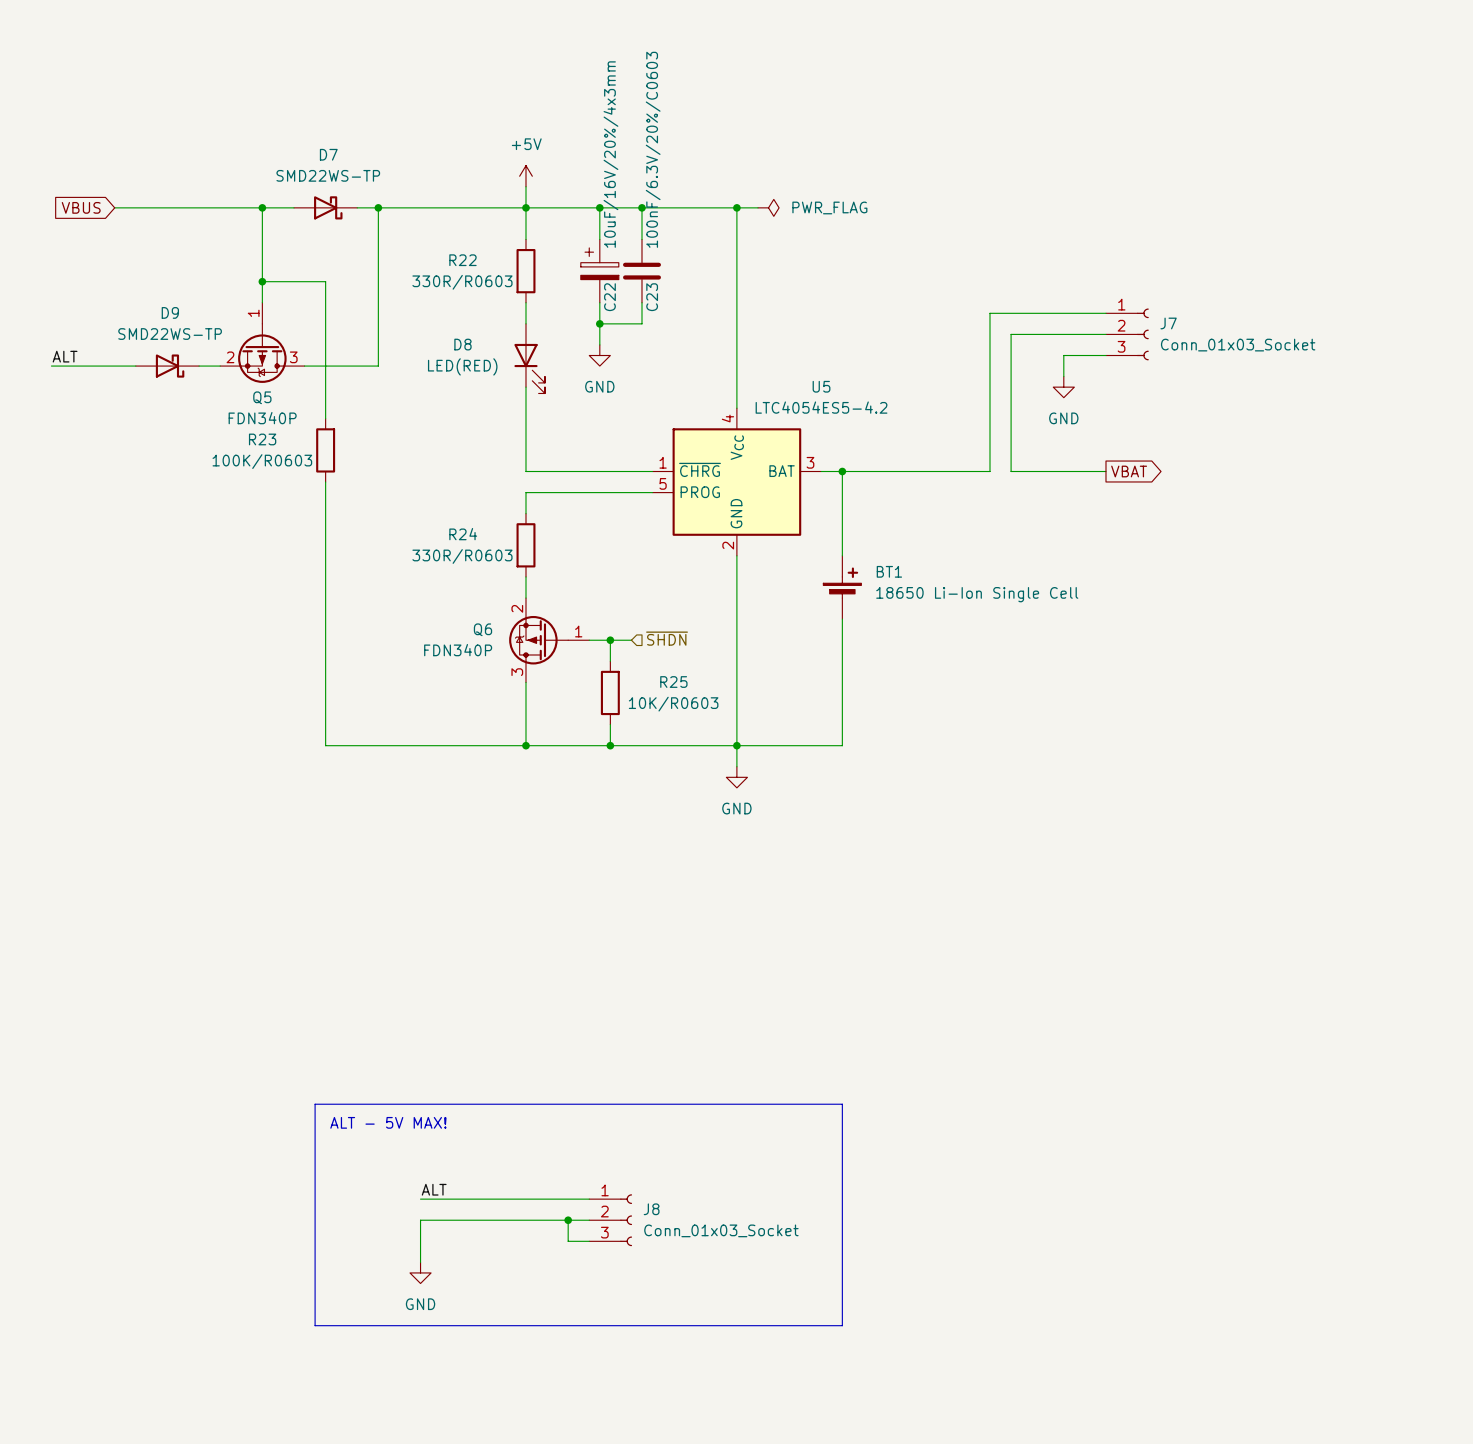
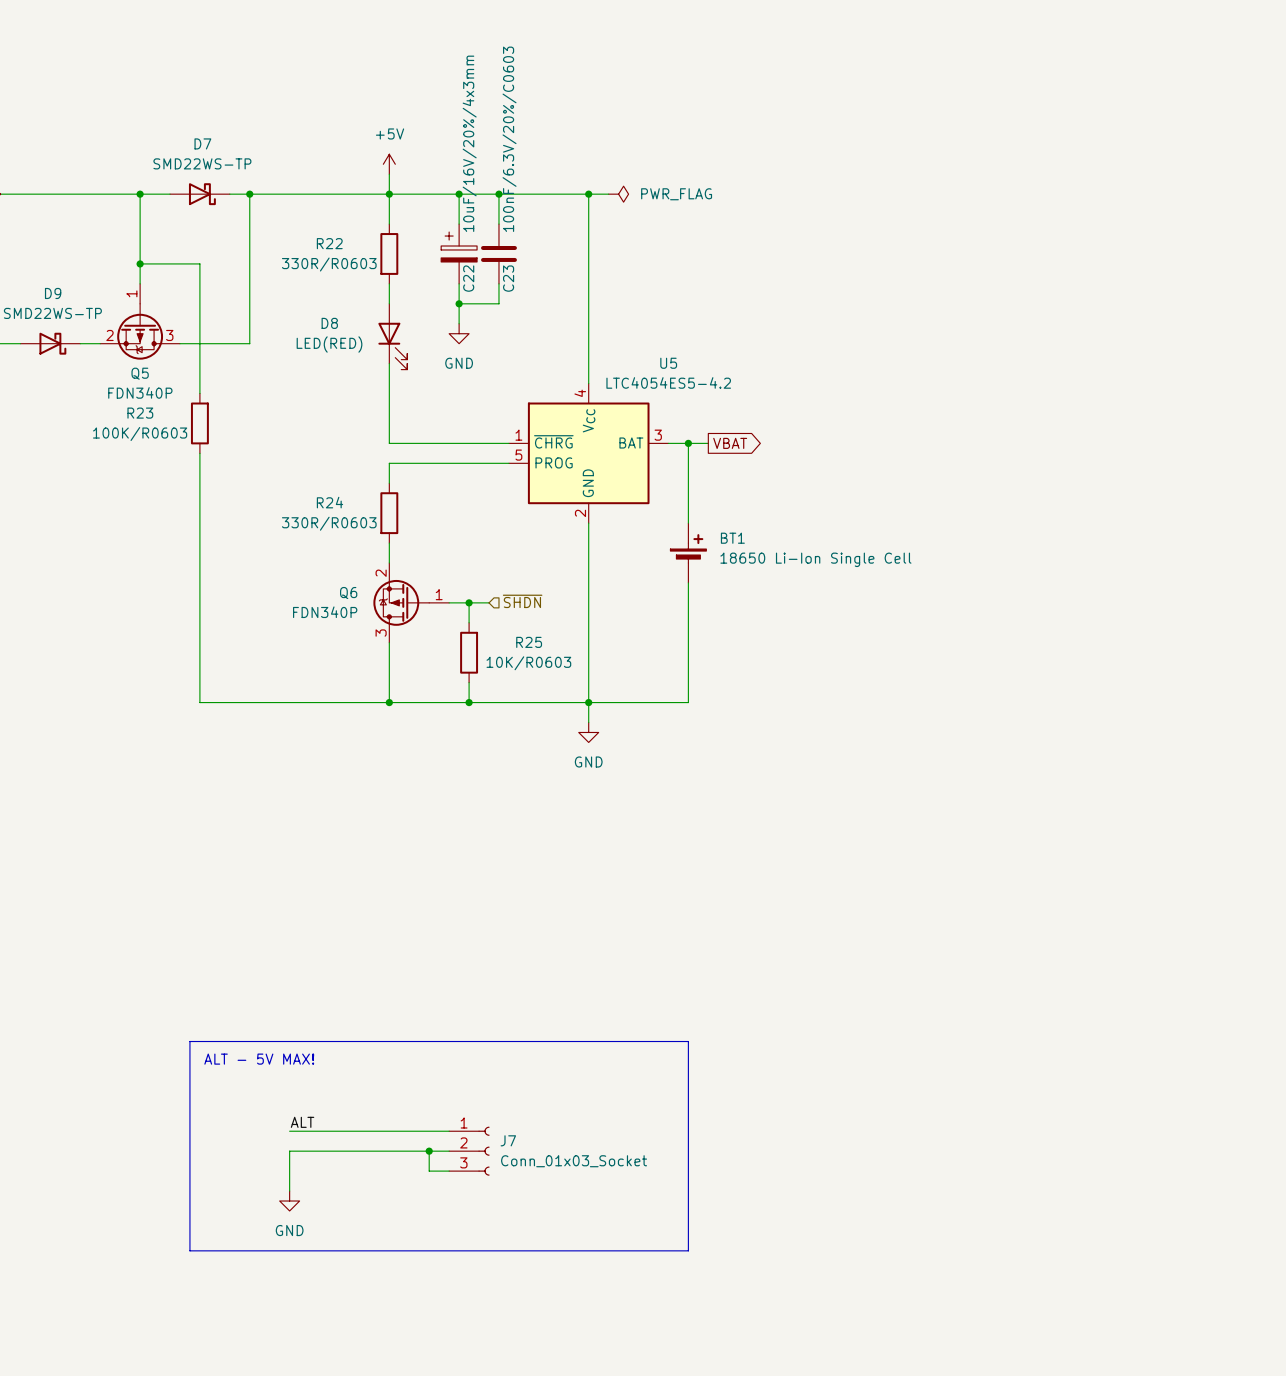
wire: (1105, 313) (989, 313) (989, 471) (863, 471) -> none
wire: (1105, 334) (1011, 334) (1011, 471) (1105, 471) -> none
J7: Conn_01x03_Socket (1127, 334) -> none
wire: (1105, 355) (1063, 355) (1063, 376) -> none
power symbol: GND (1063, 387) -> none
global label: none -> VBAT (730, 443)
global label: VBAT (1129, 471) -> none
J8 name: J8 (651, 1209) -> J7 (508, 1140)

